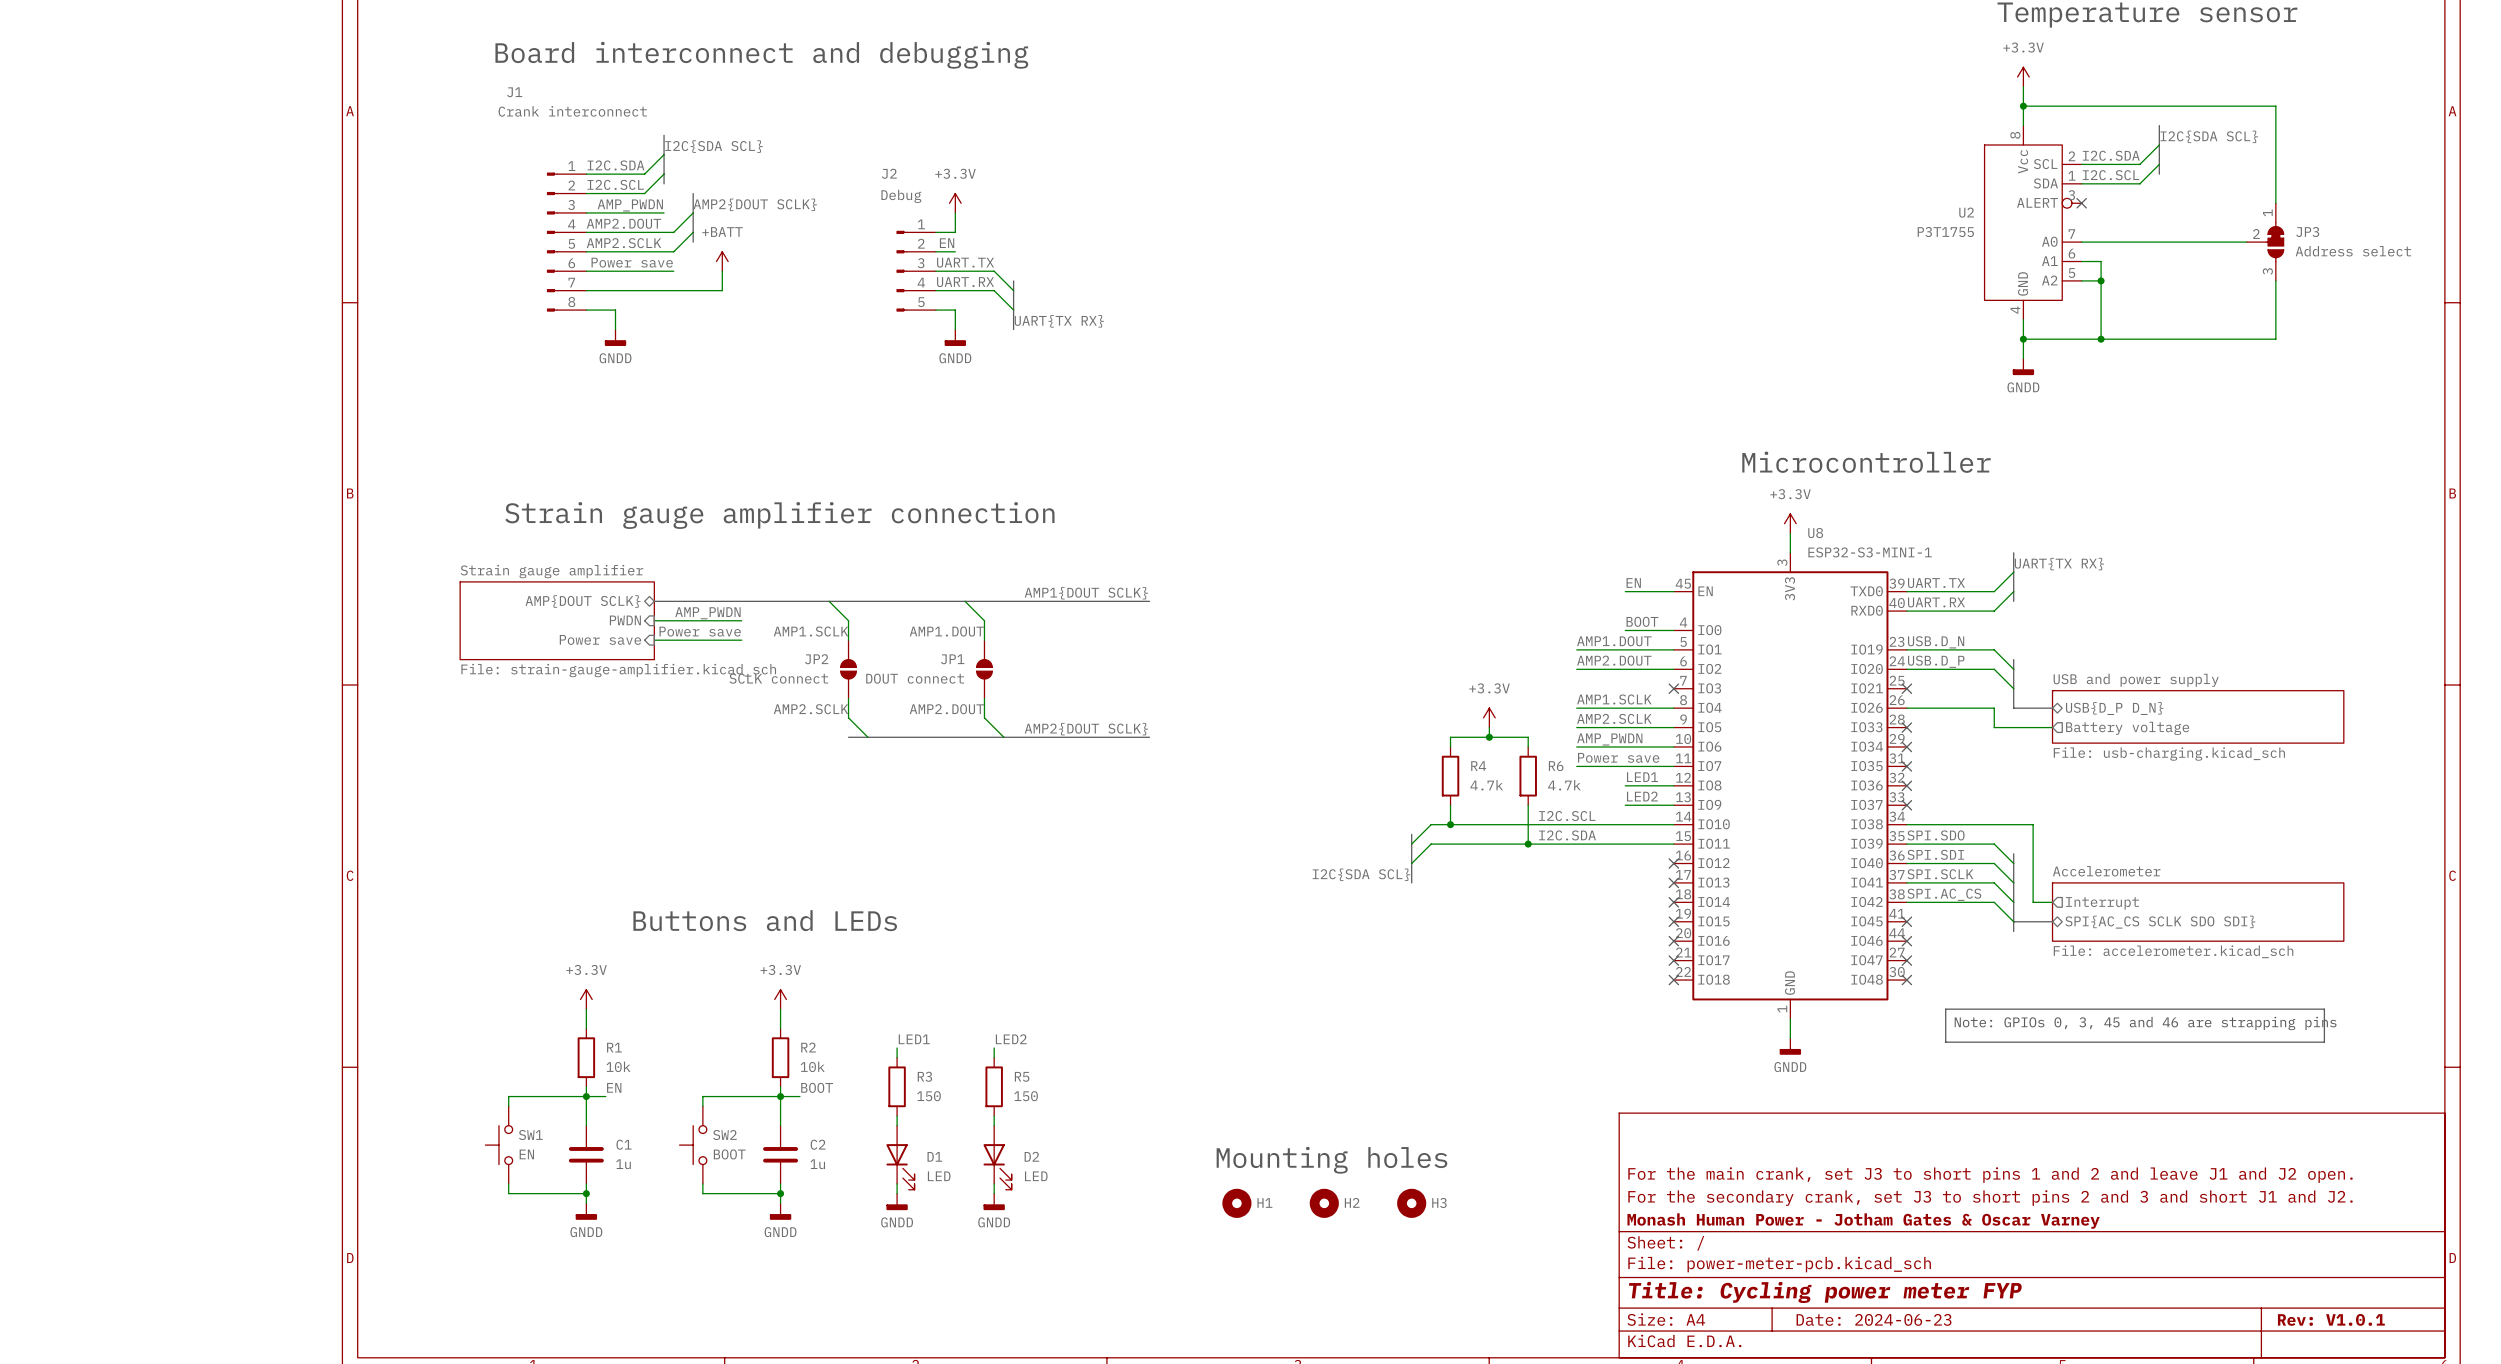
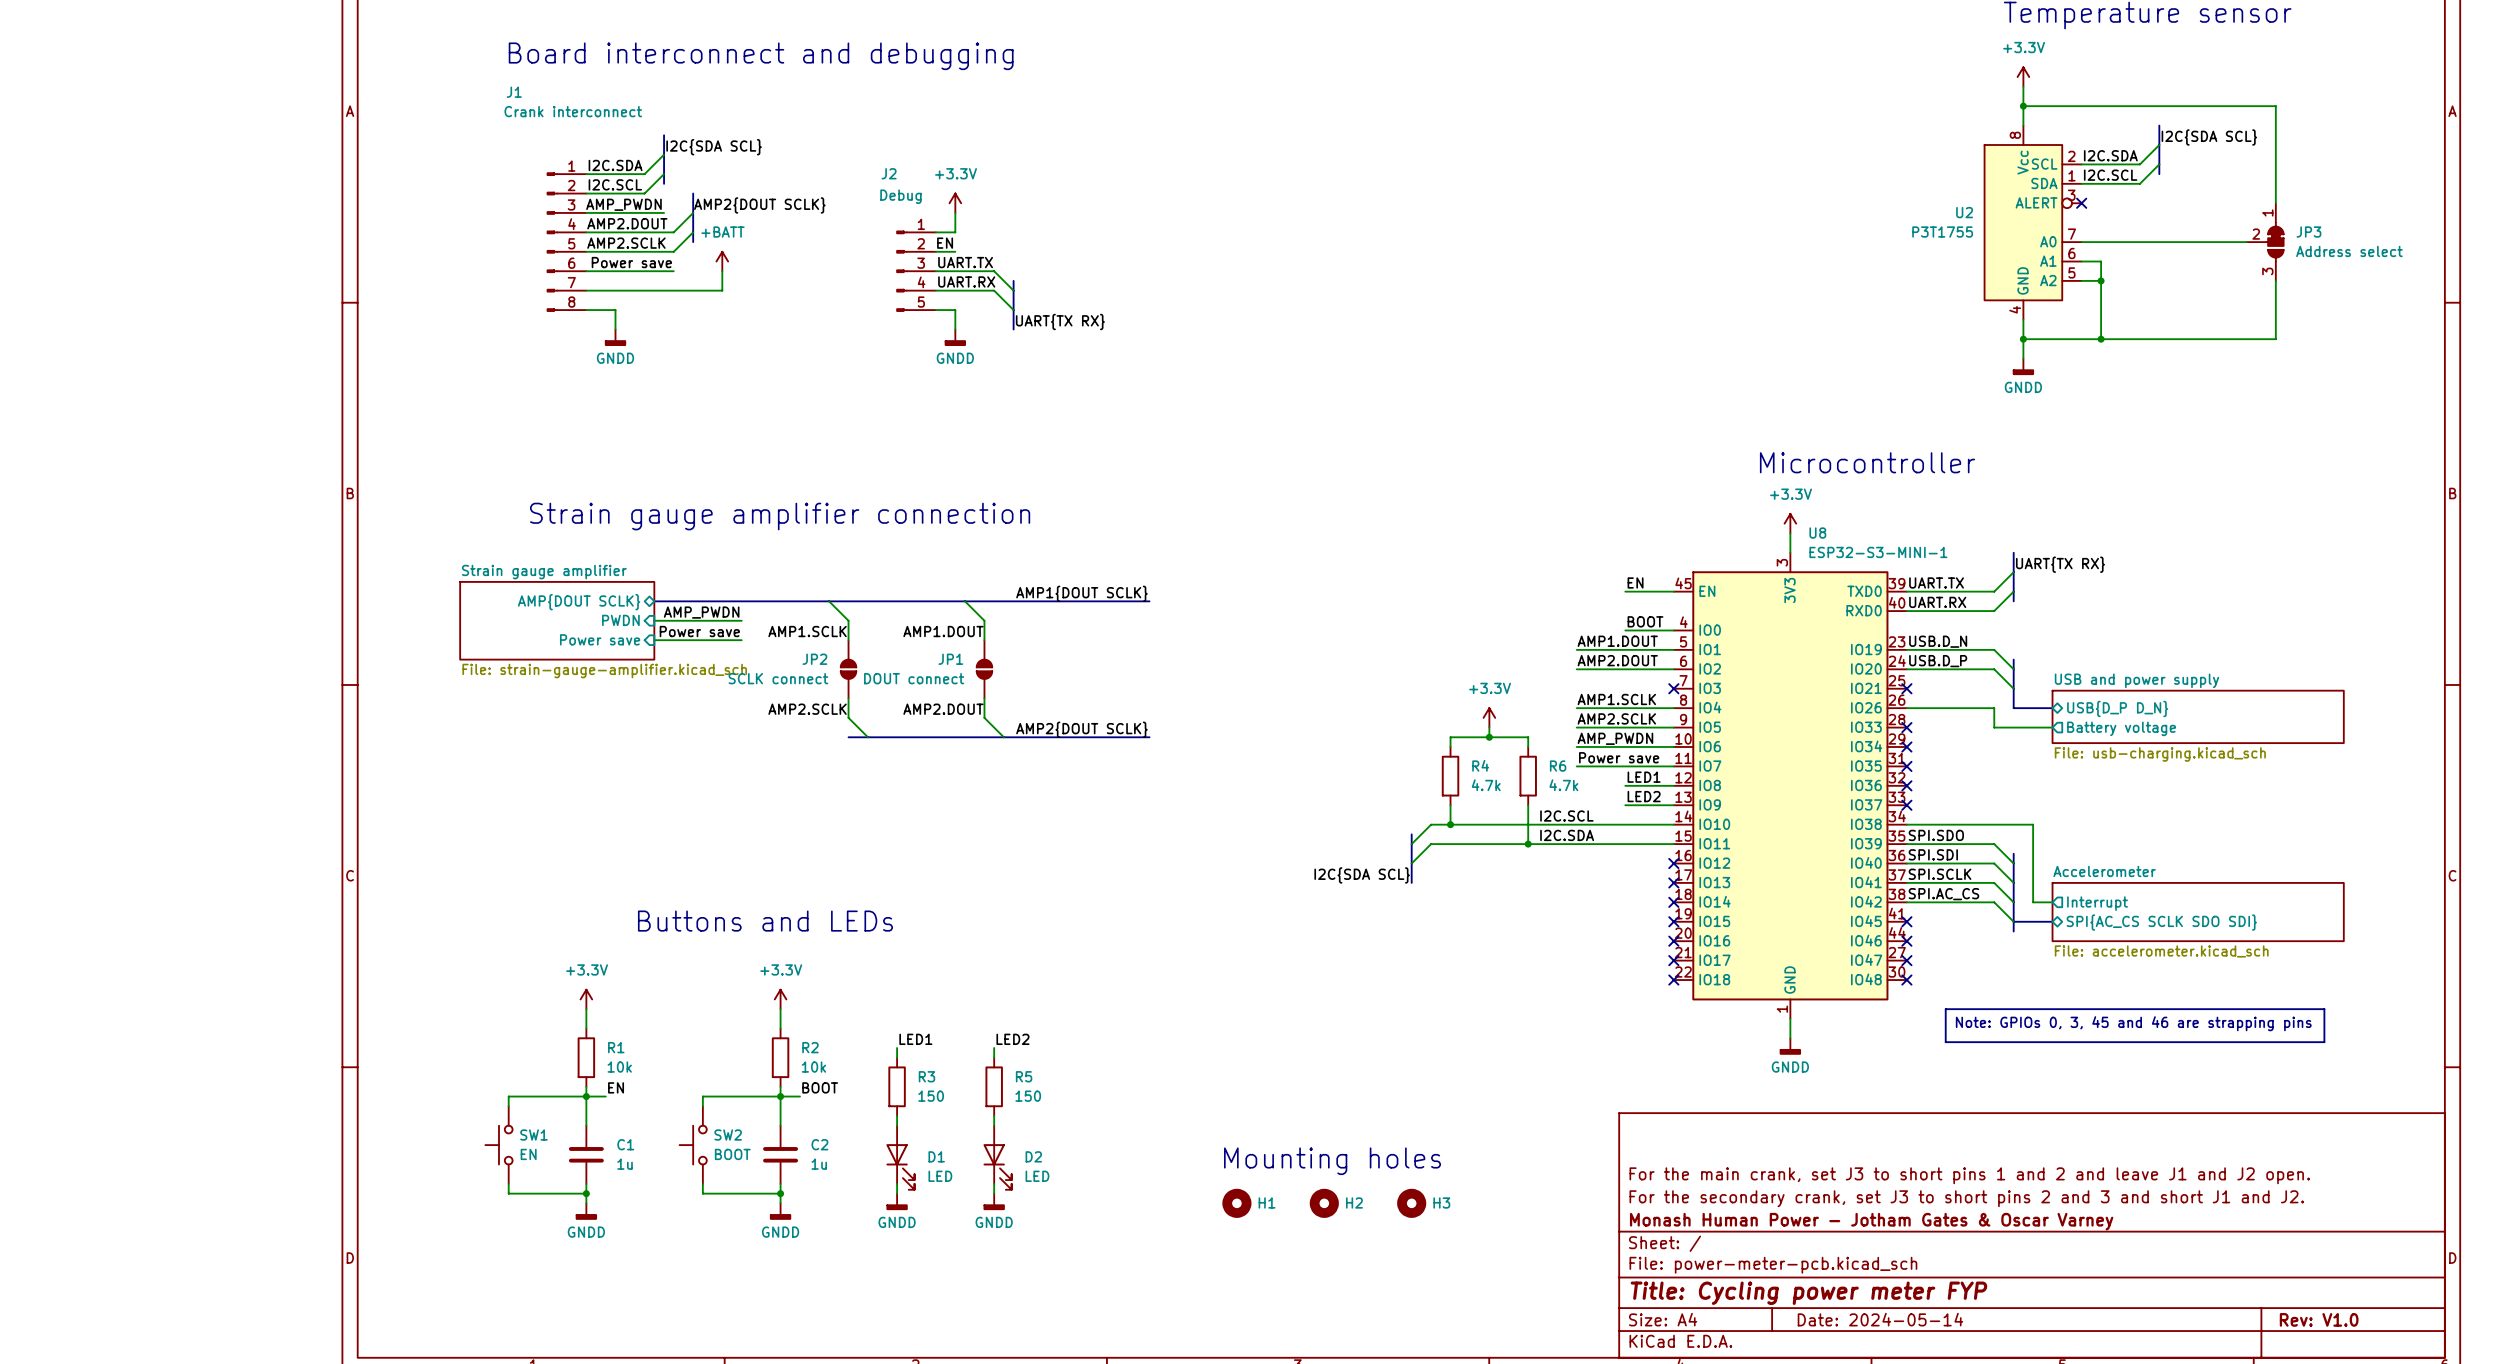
title block: Date: 2024-06-23 (1874, 1319) -> Date: 2024-05-14 (1880, 1319)
title block: Rev: V1.0.1 (2331, 1319) -> Rev: V1.0 (2319, 1319)

